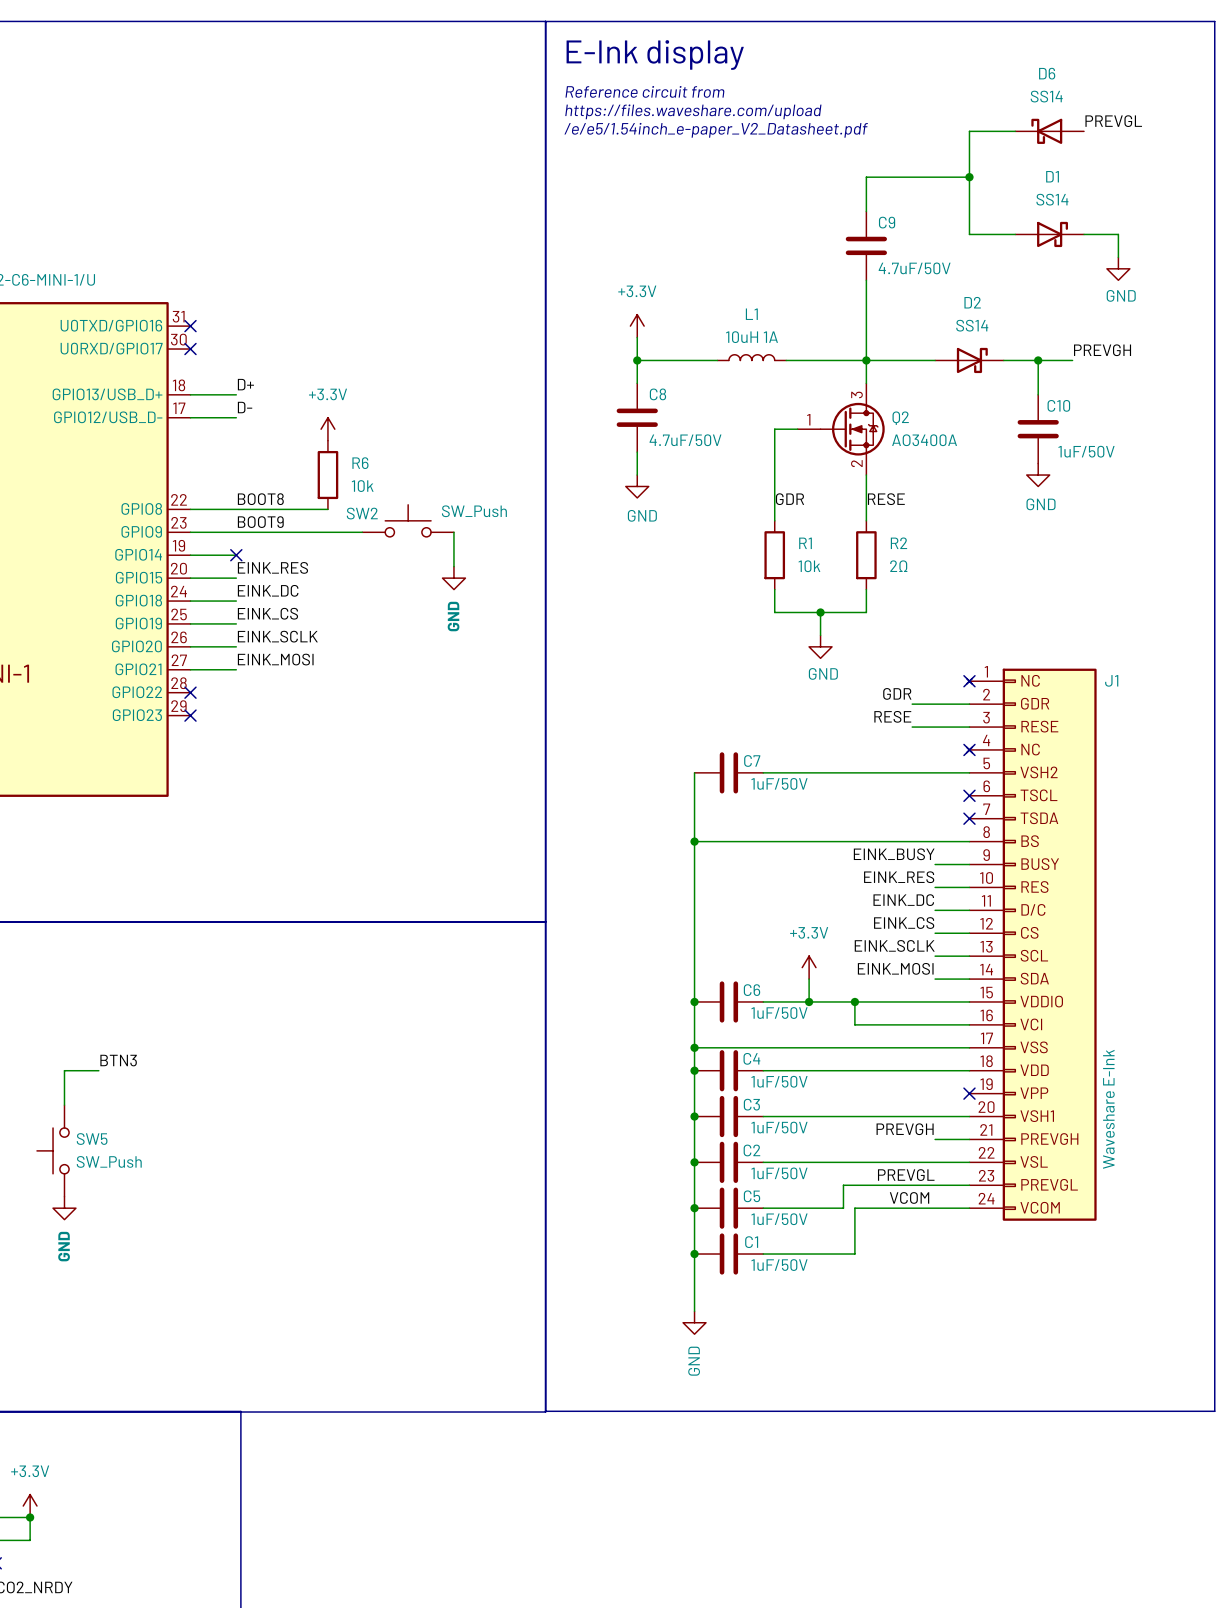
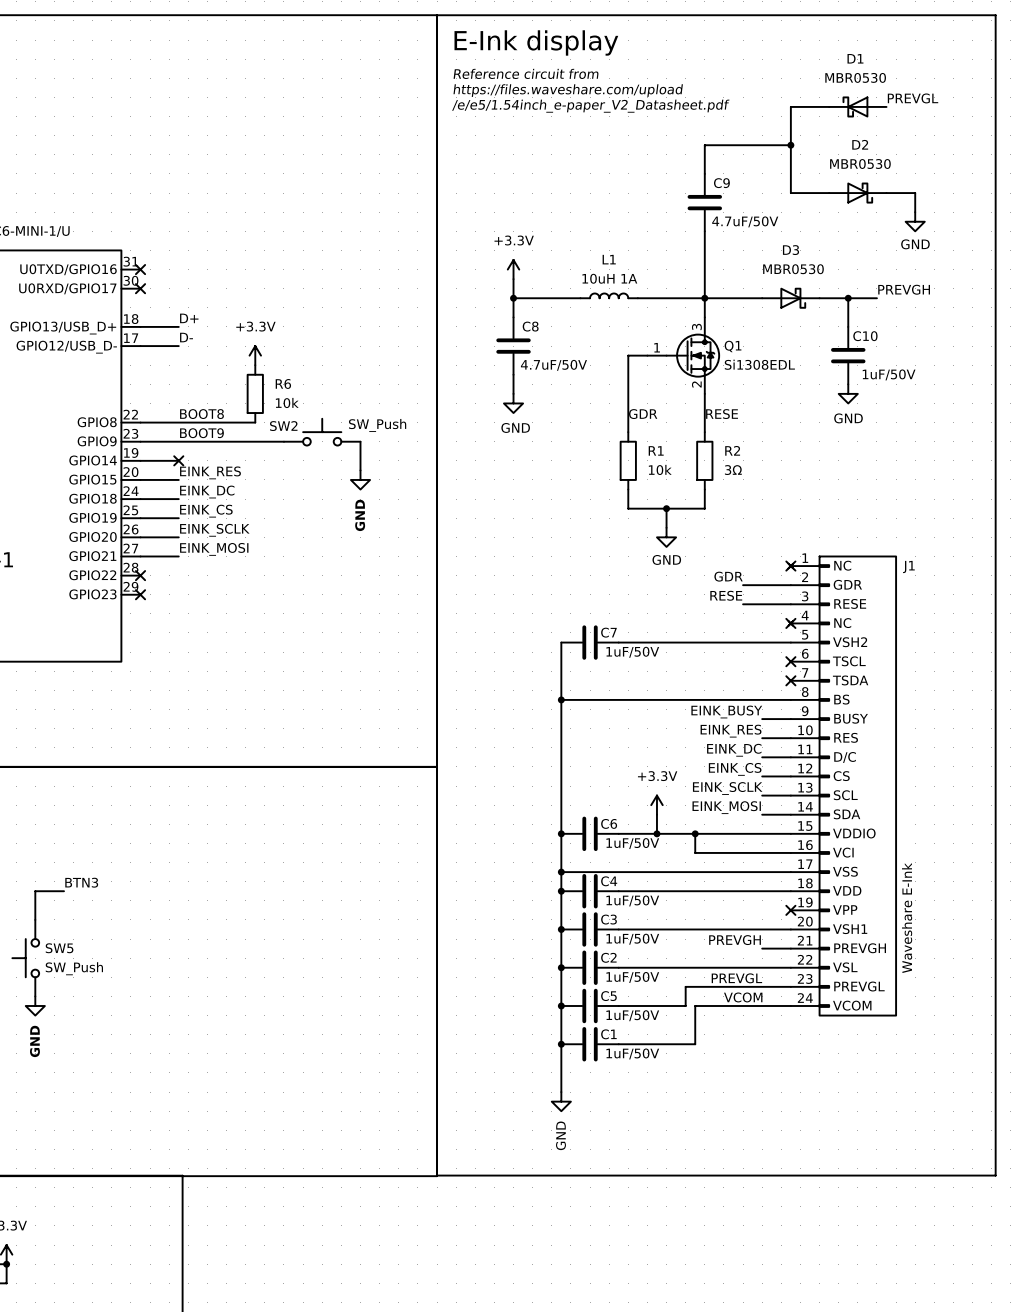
D6 name: D6 (1047, 73) -> D1 (855, 58)
D6 value: SS14 (1046, 96) -> MBR0530 (855, 77)
D1: SS14 (1049, 234) -> none
D2 value: SS14 (972, 325) -> MBR0530 (860, 164)
D2 position: (969, 360) -> (857, 193)
D3: none -> MBR0530 (790, 298)
D2 flip: as is (972, 360) -> up-down (860, 193)
Q2 name: Q2 (900, 418) -> Q1 (733, 346)
Q2 value: AO3400A (924, 440) -> Si1308EDL (759, 364)
R2 value: 2Ω (898, 566) -> 3Ω (733, 470)

